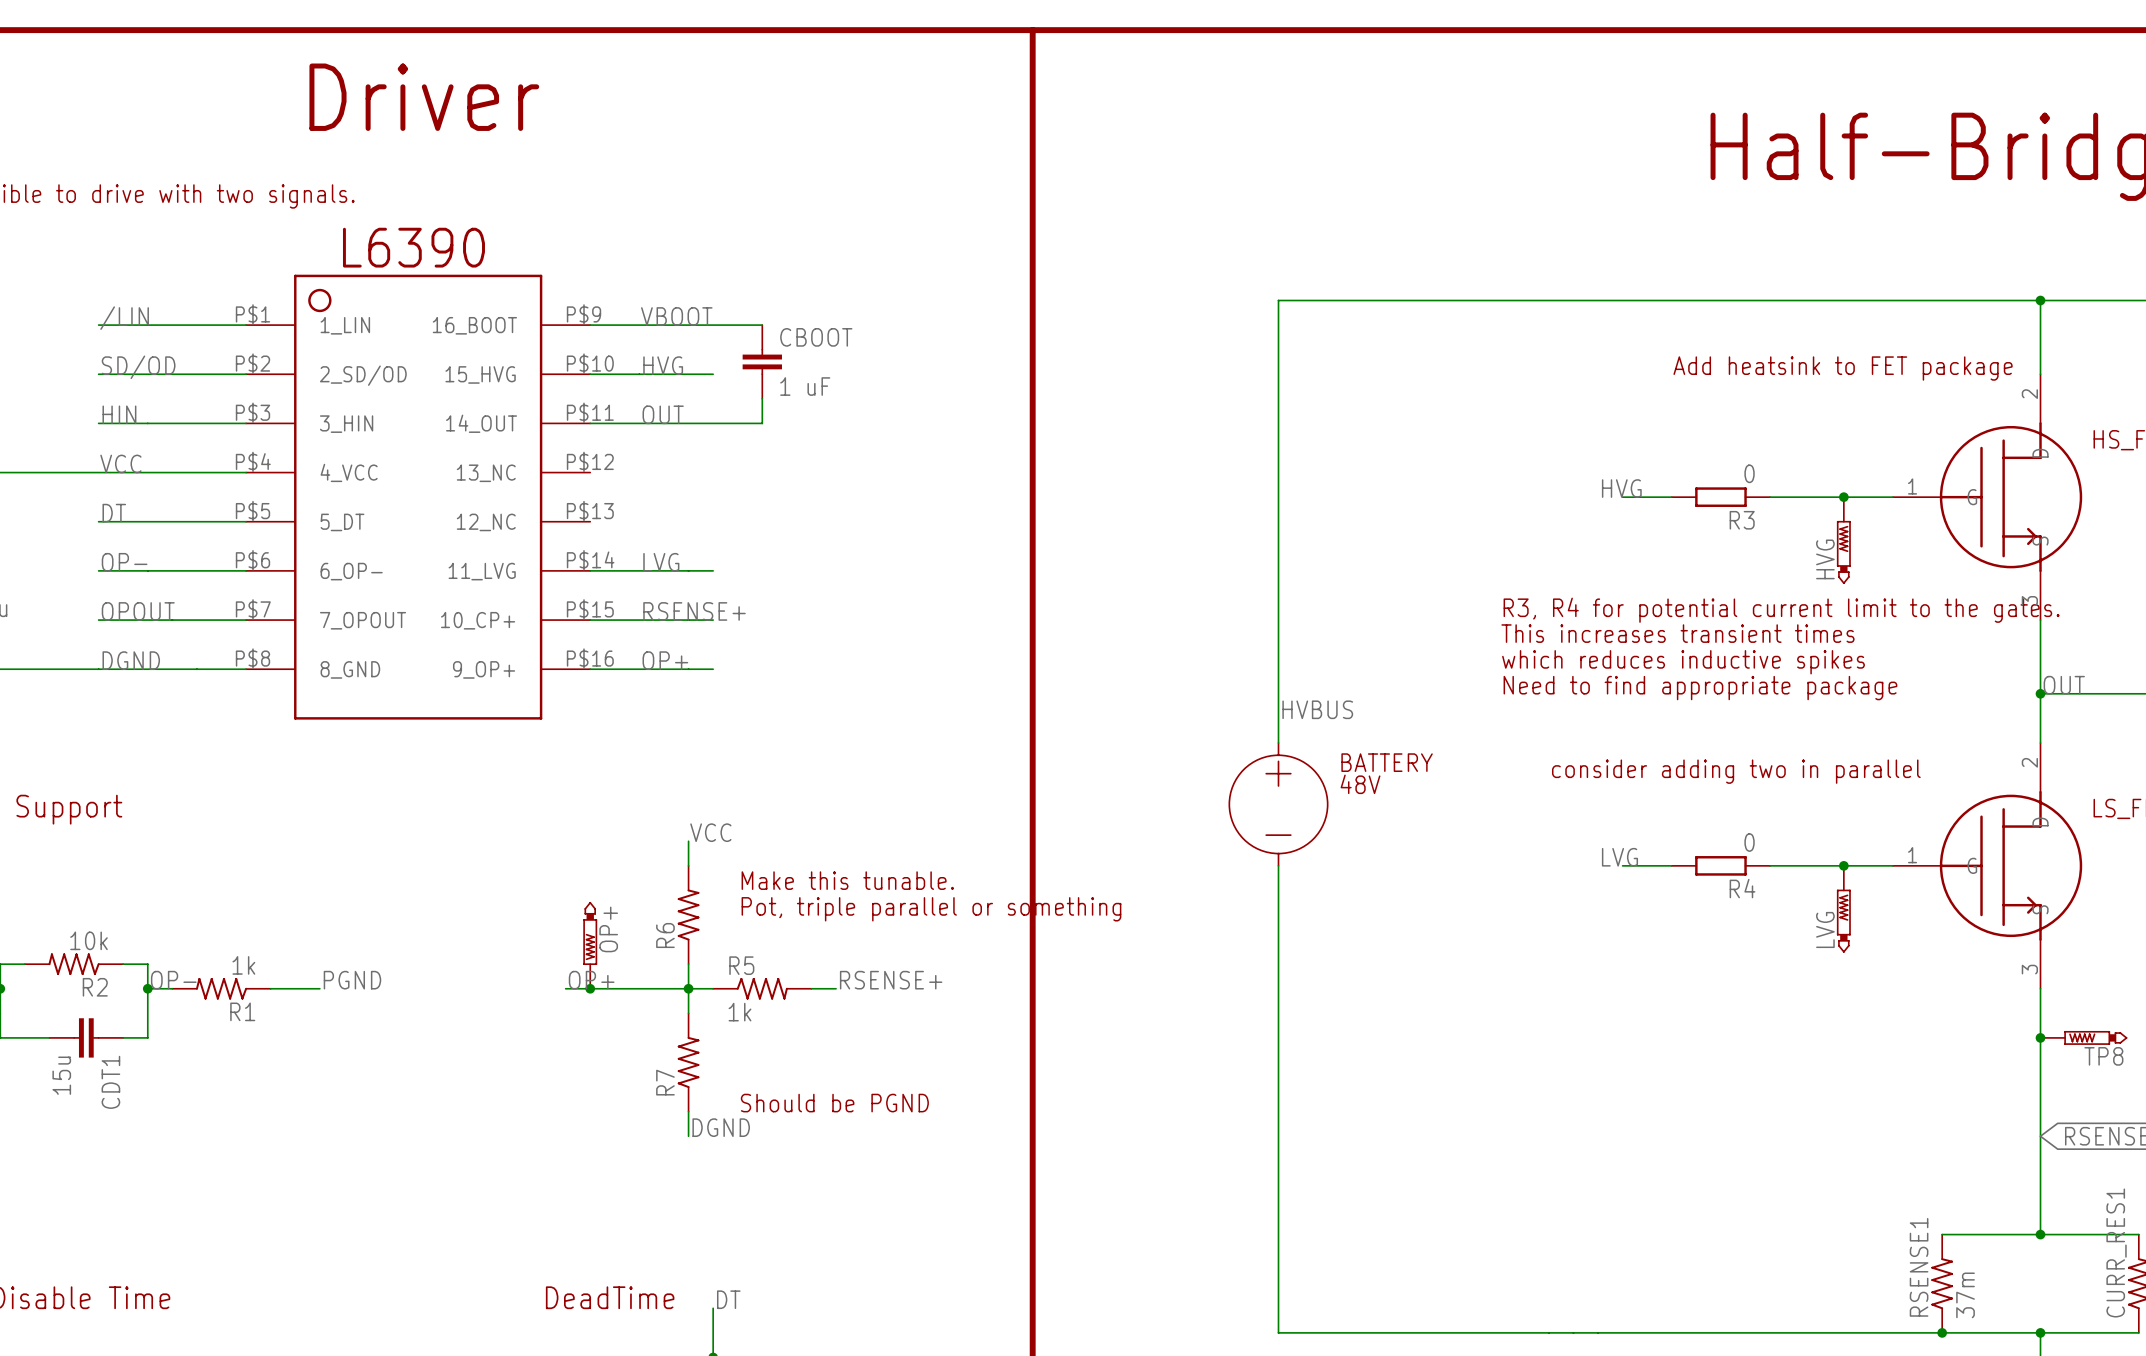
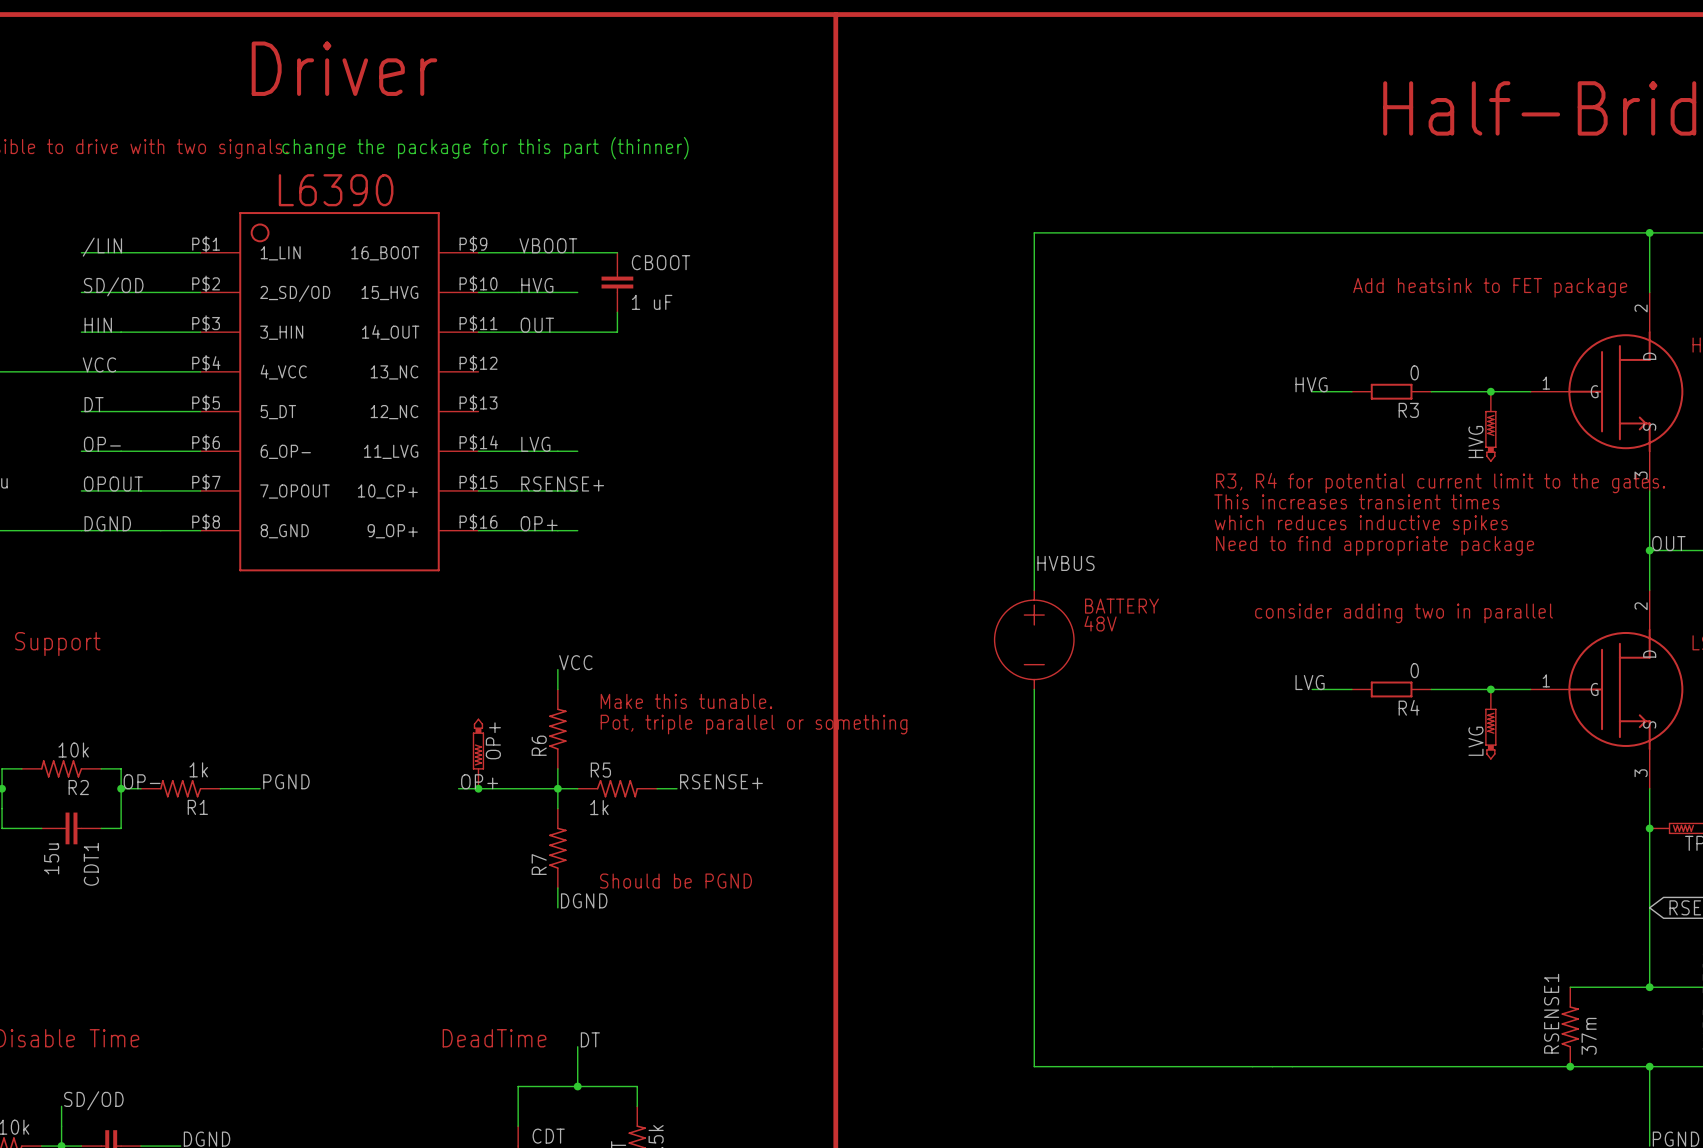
text: none -> change the package for this part (thinner) (485, 148)

